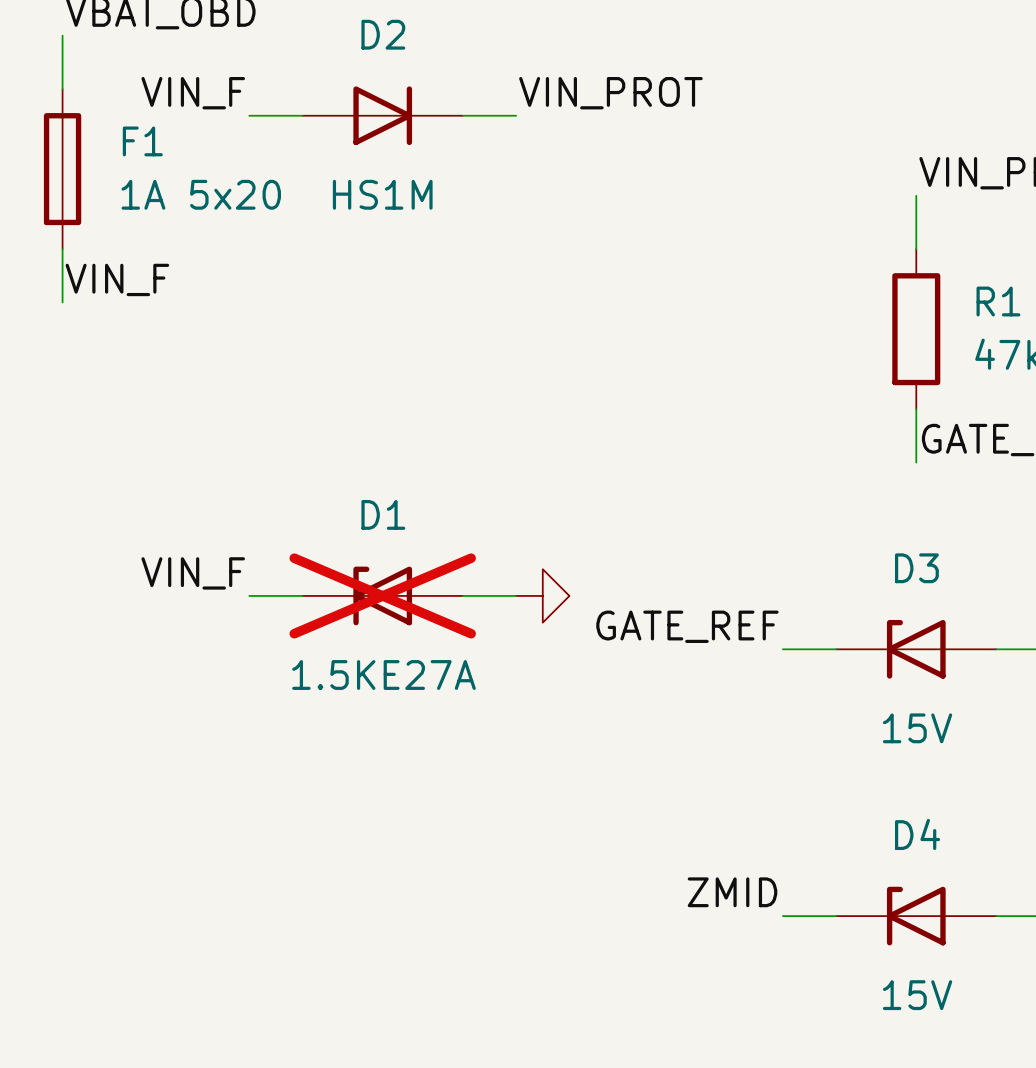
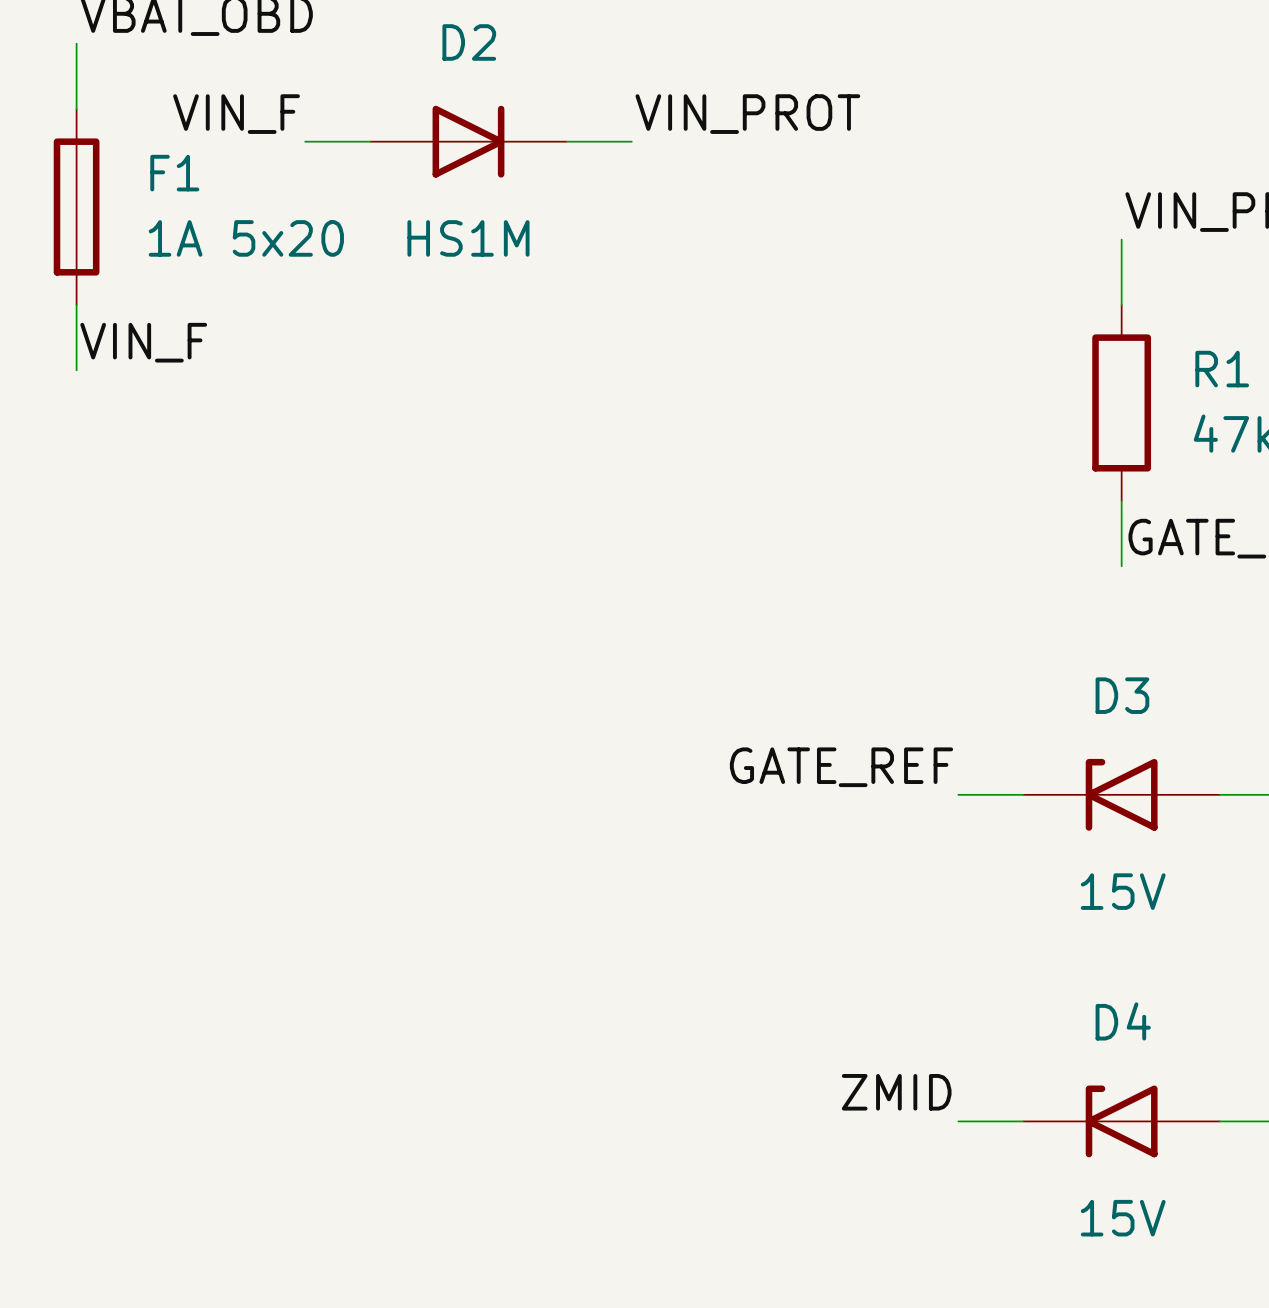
label: VIN_F (193, 573) -> none
wire: (249, 595) (302, 595) -> none
D1: 1.5KE27A (382, 595) -> none
wire: (462, 595) (516, 595) -> none
power symbol: (542, 595) -> none

